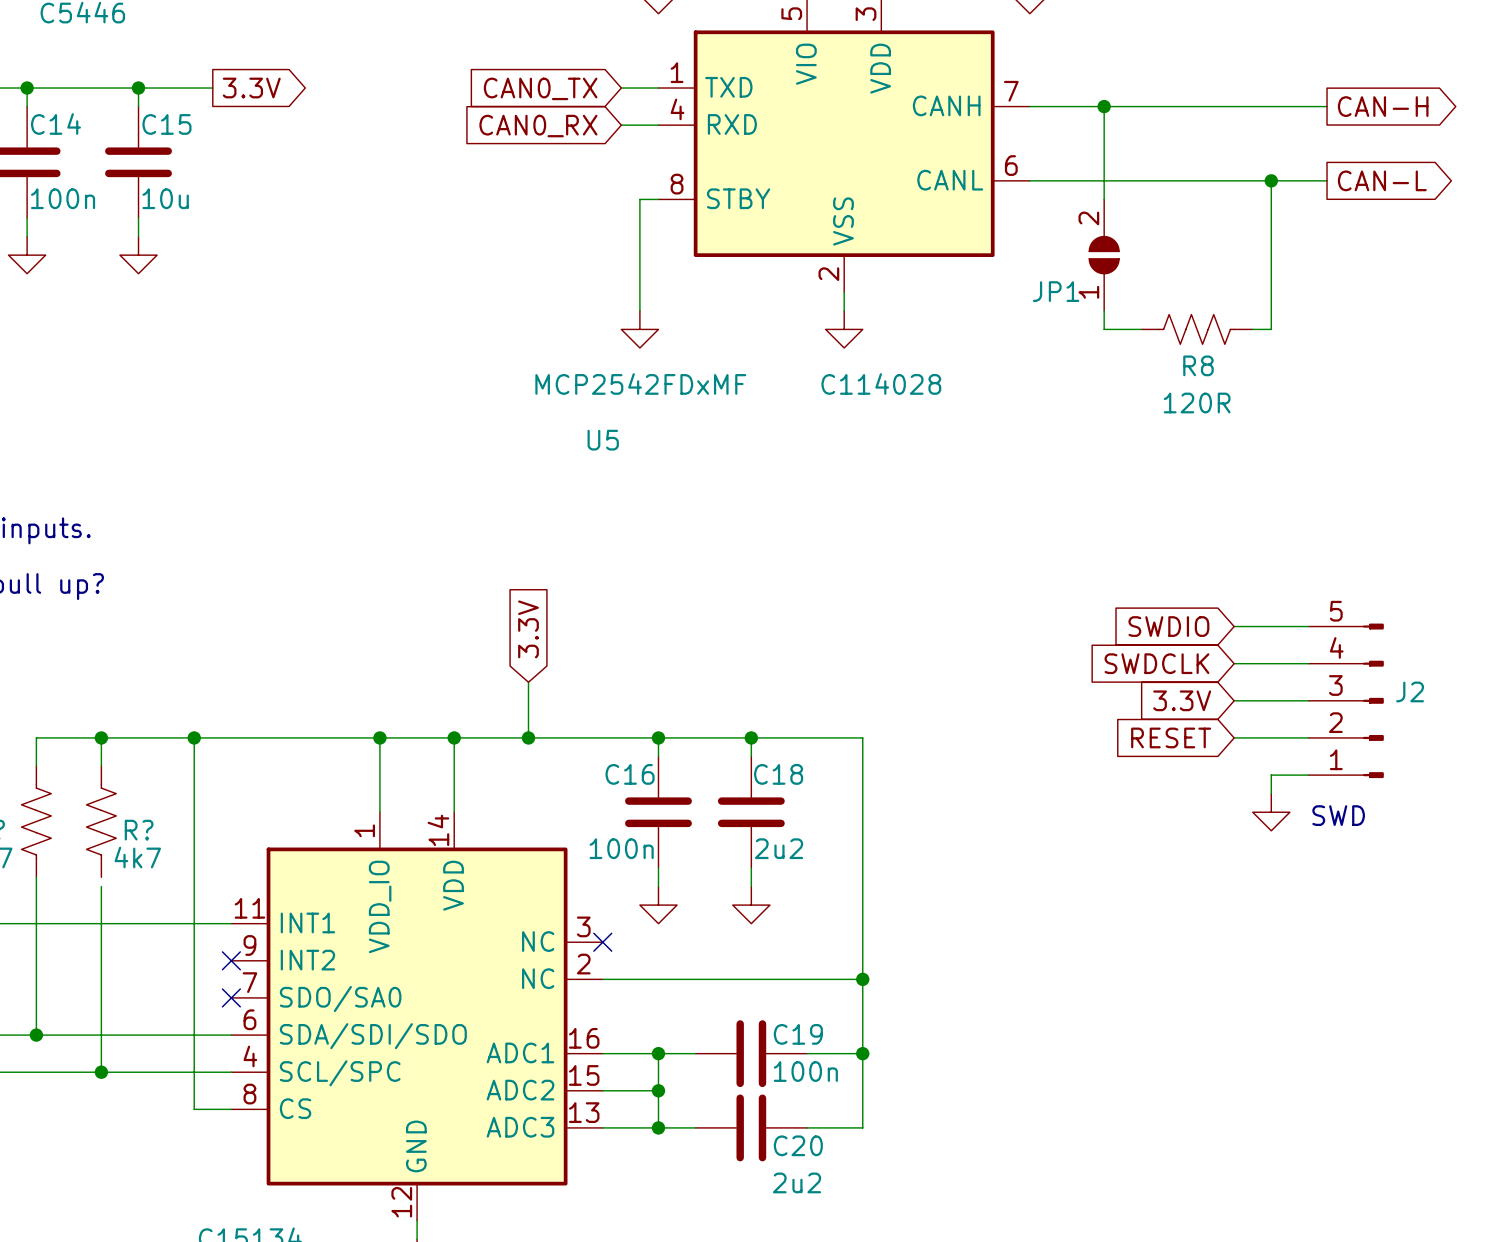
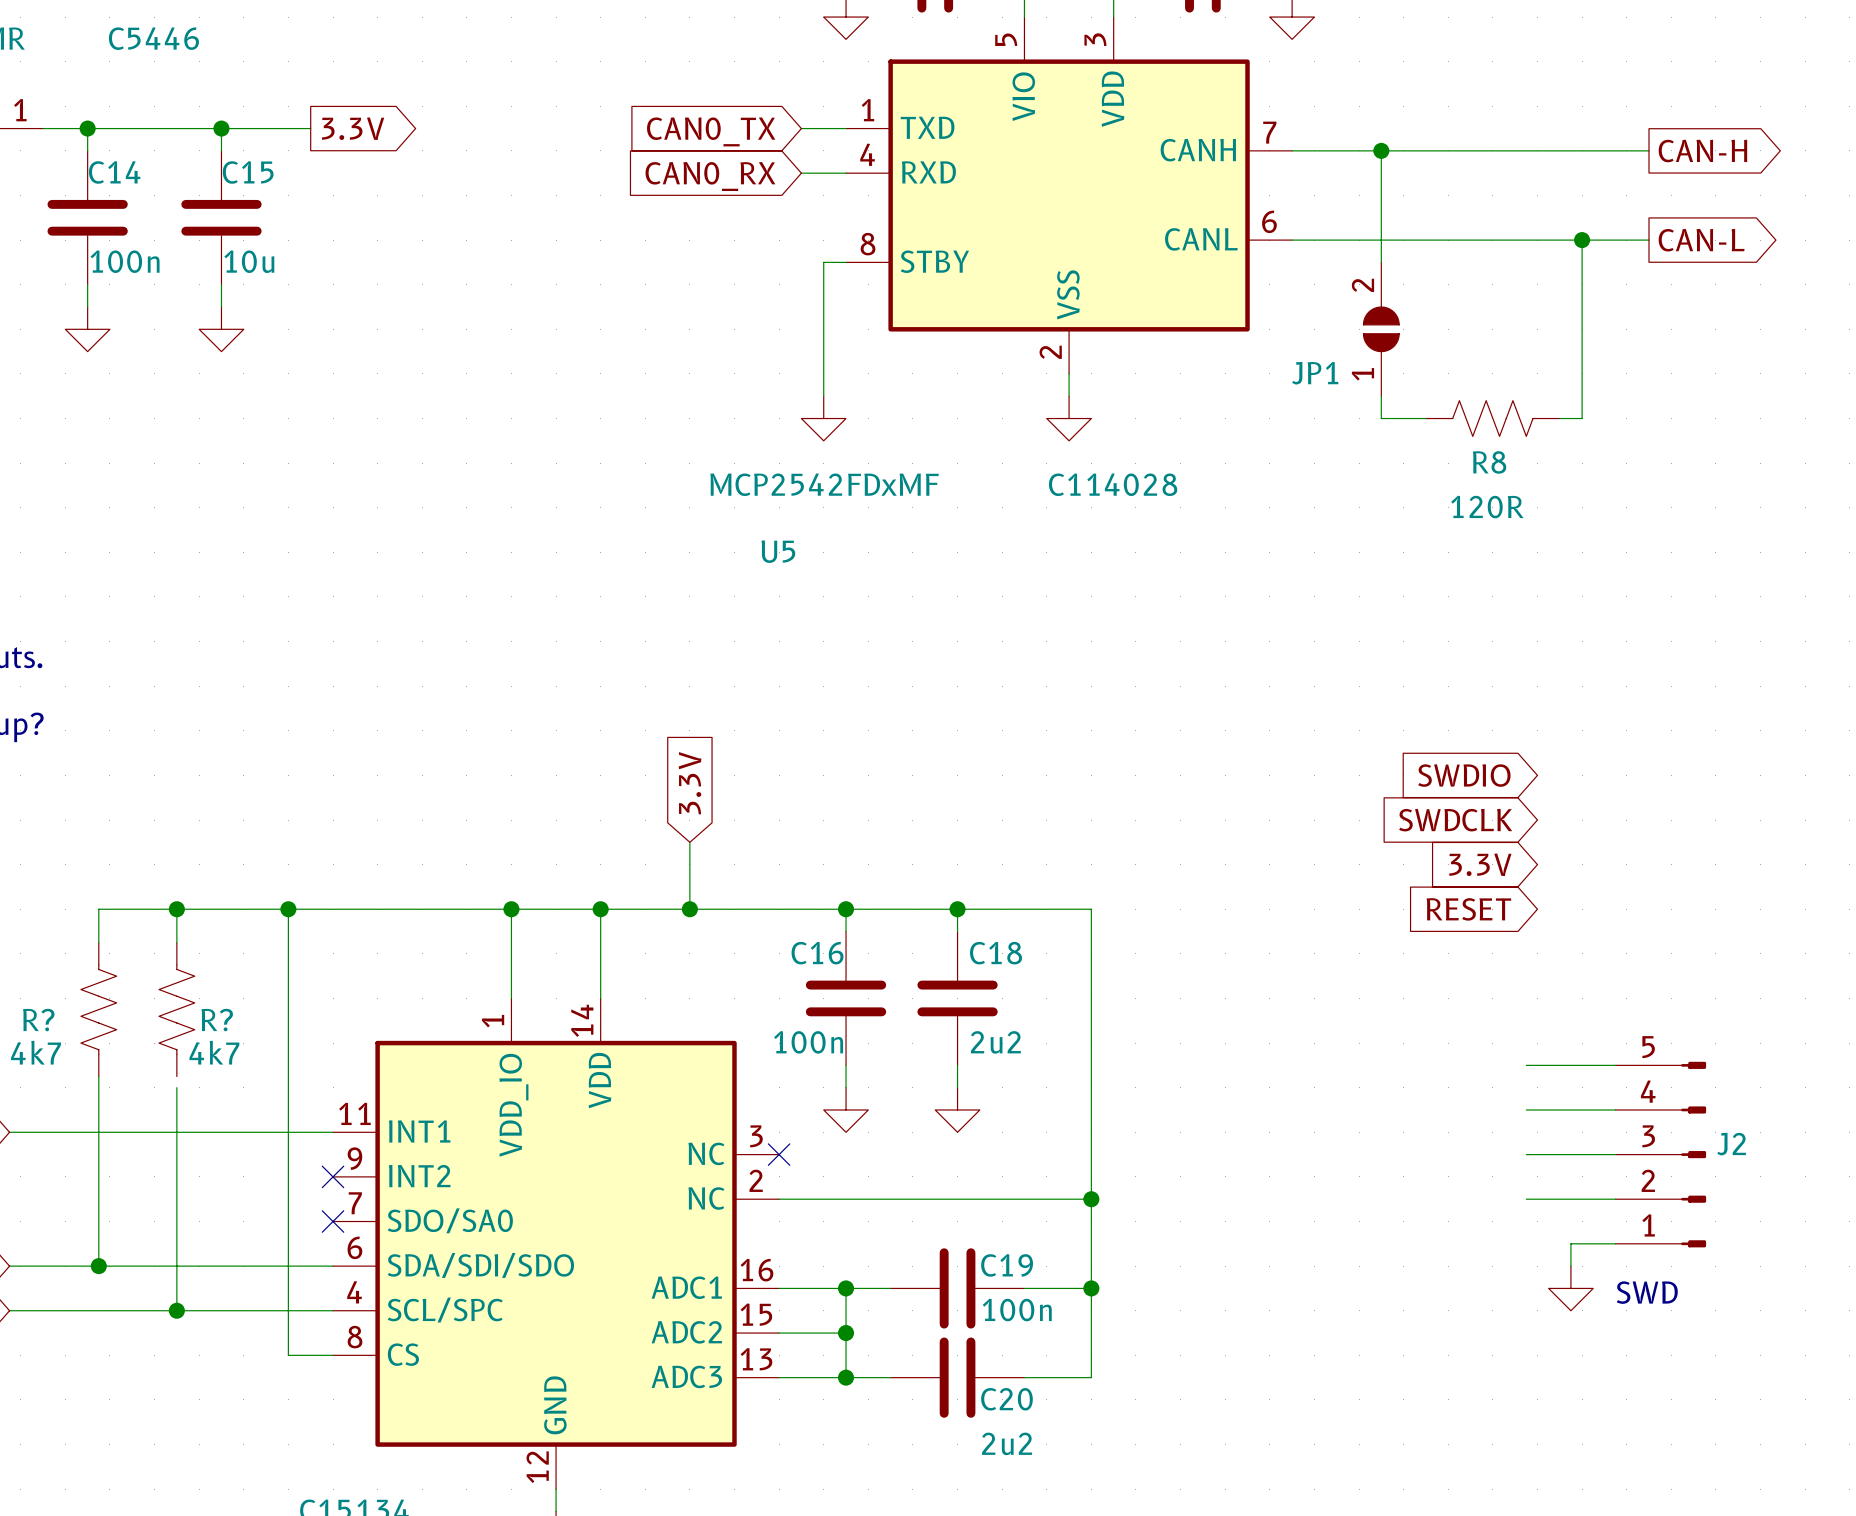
wire: (1234, 626) (1308, 626) -> (1526, 1065) (1615, 1065)
wire: (1234, 663) (1308, 663) -> (1526, 1109) (1615, 1109)
wire: (1234, 700) (1308, 700) -> (1526, 1154) (1615, 1154)
J2 position: (1346, 700) -> (1660, 1154)
wire: (1234, 737) (1308, 737) -> (1526, 1199) (1615, 1199)
wire: (1308, 775) (1271, 775) (1271, 793) -> (1615, 1243) (1570, 1243) (1570, 1266)
power symbol position: (1271, 812) -> (1570, 1288)
text position: SWD (1338, 815) -> SWD (1647, 1292)

